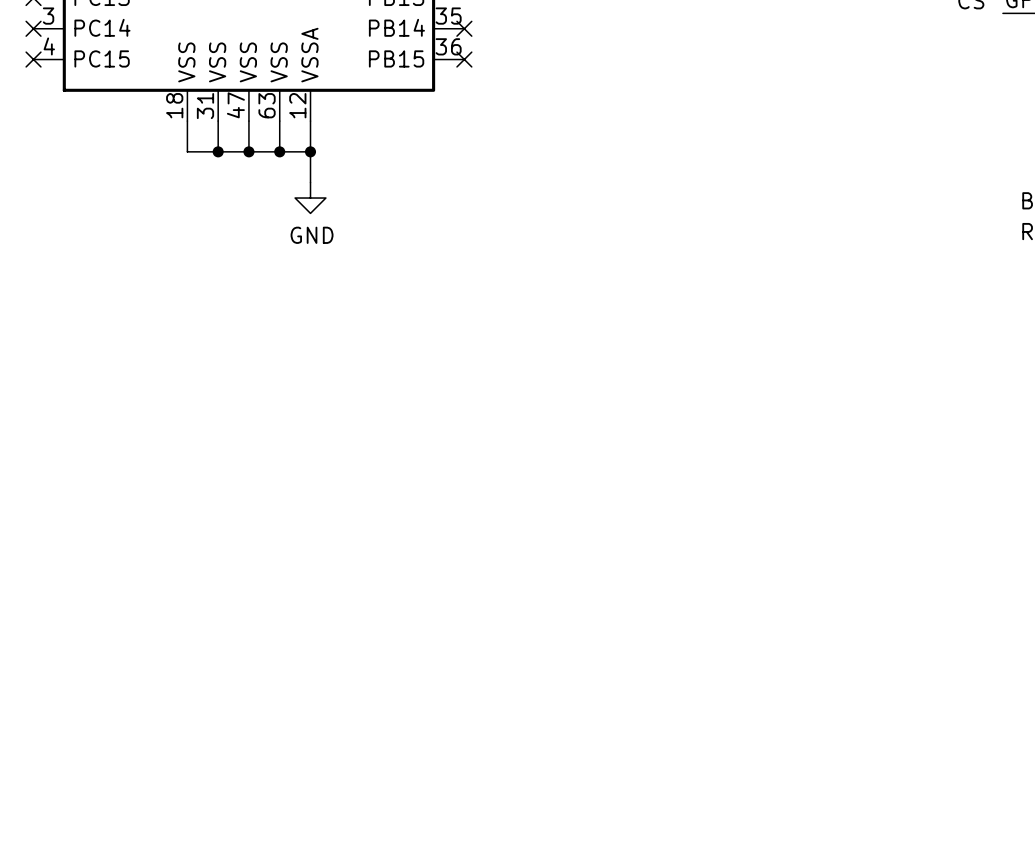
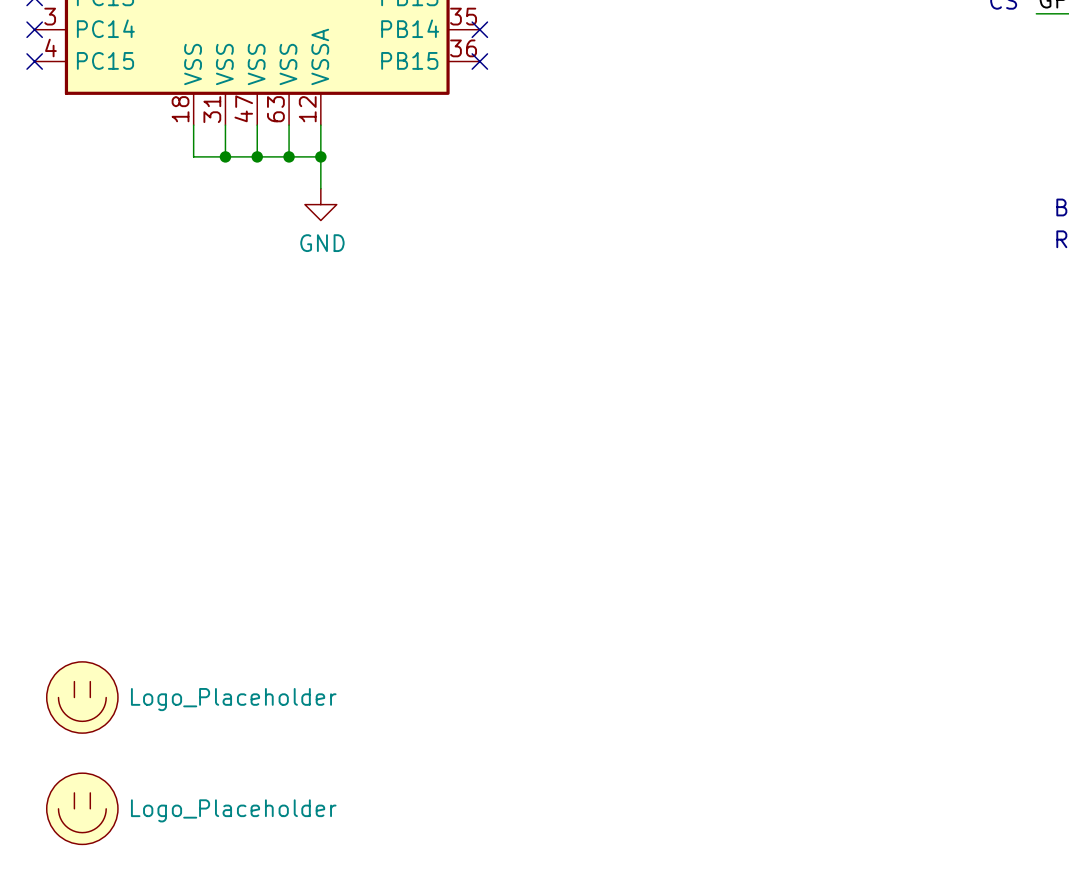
part: none -> Logo_Placeholder (82, 697)
part: none -> Logo_Placeholder (82, 808)

